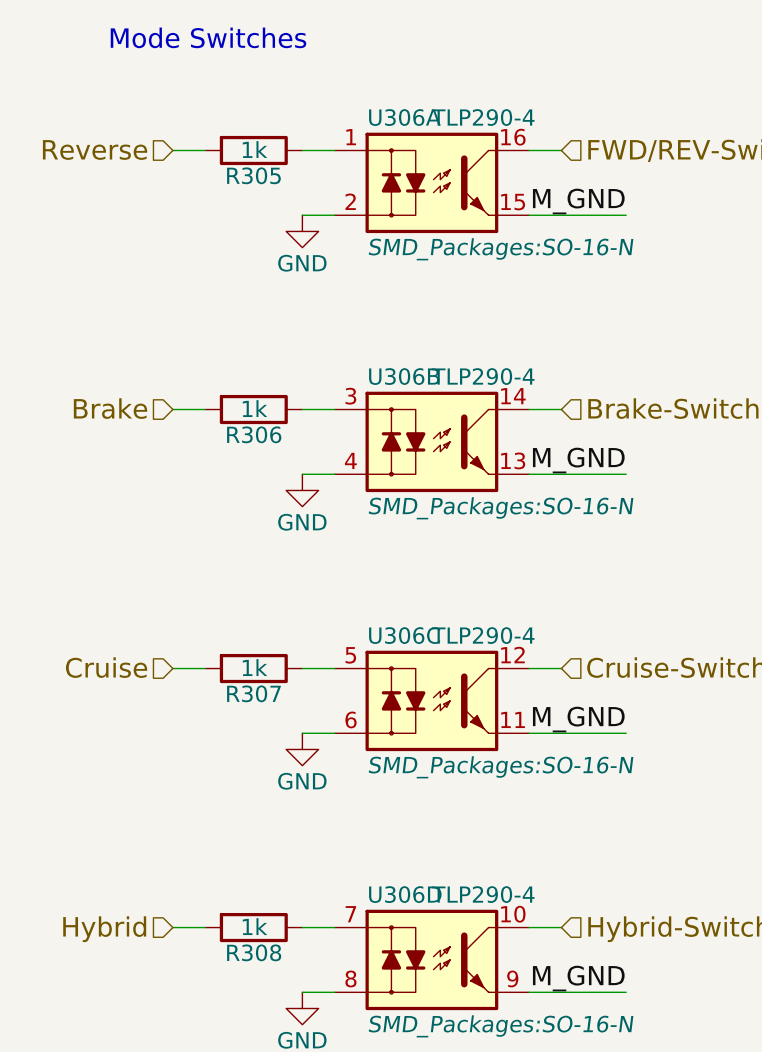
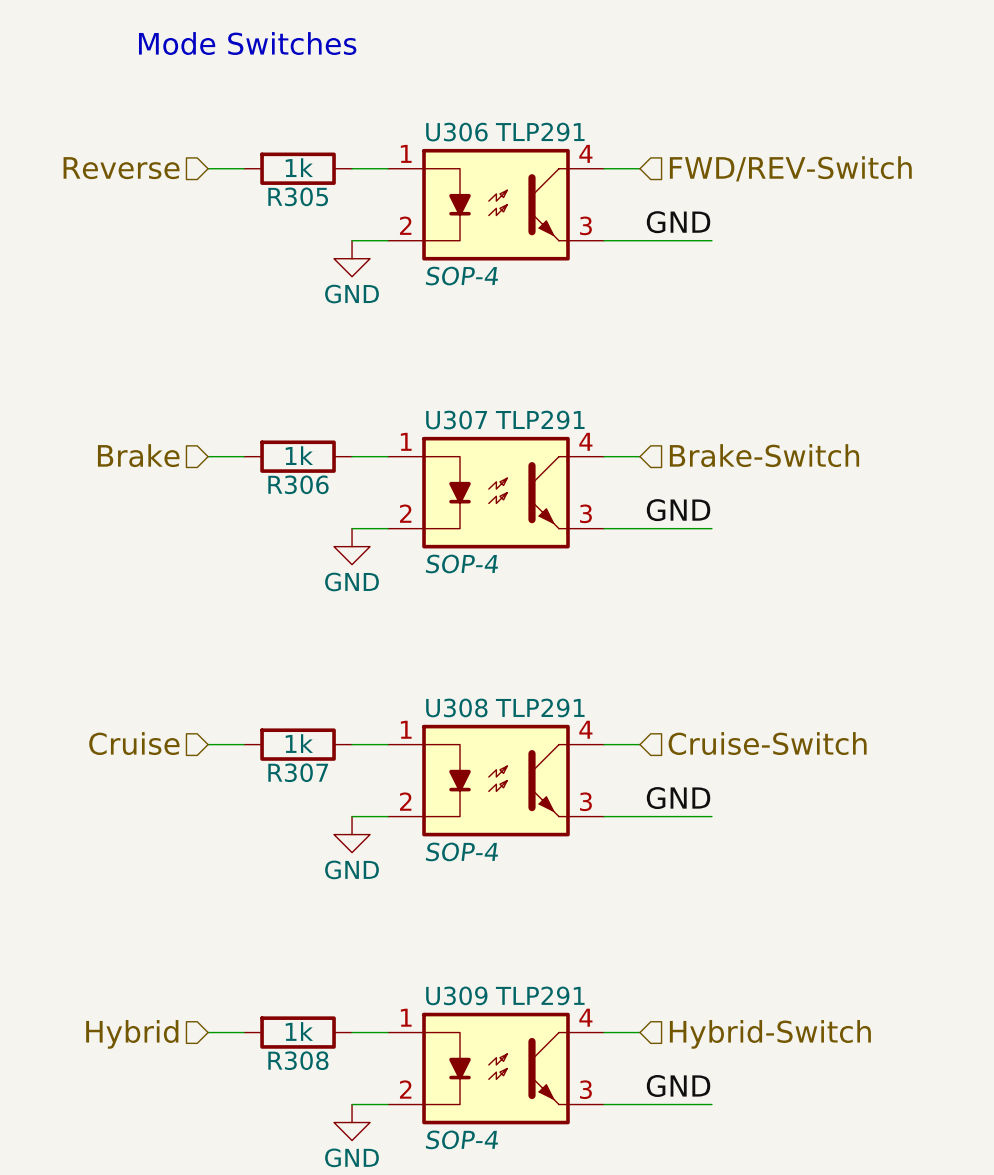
U306A: TLP290-4 (431, 182) -> none
U306: none -> TLP291 (496, 204)
label: M_GND (578, 201) -> GND (678, 222)
U306B: TLP290-4 (431, 441) -> none
U307: none -> TLP291 (496, 492)
label: M_GND (578, 460) -> GND (678, 510)
U306C: TLP290-4 (431, 700) -> none
U308: none -> TLP291 (496, 780)
label: M_GND (578, 719) -> GND (678, 798)
U306D: TLP290-4 (431, 959) -> none
U309: none -> TLP291 (496, 1068)
label: M_GND (578, 978) -> GND (678, 1085)

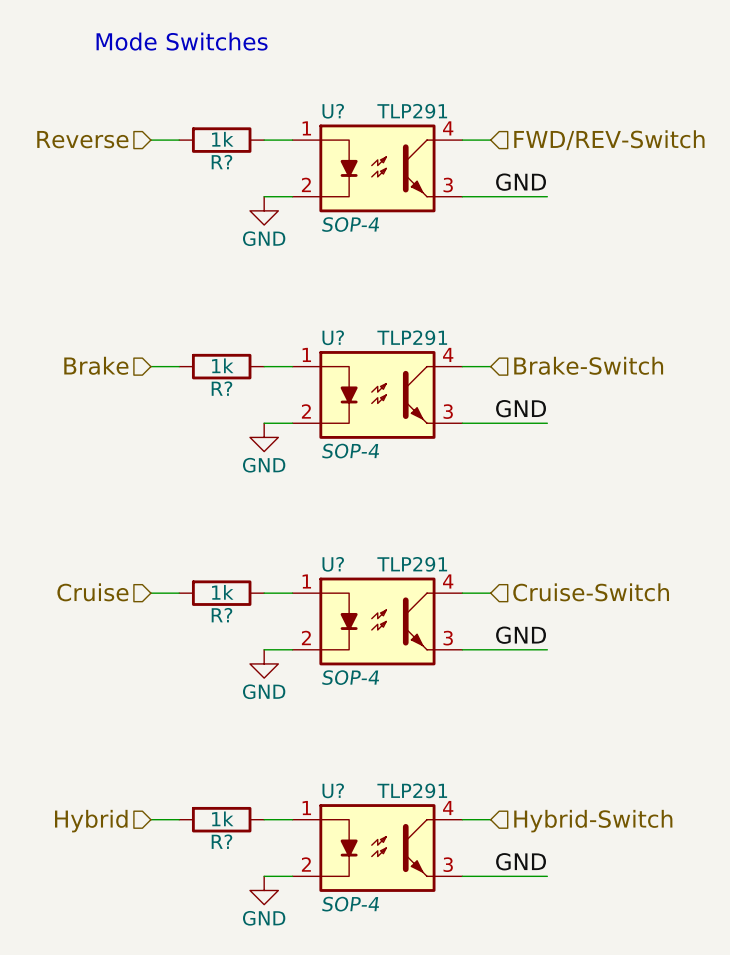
U306 name: U306 (456, 132) -> U? (333, 111)
R305 name: R305 (298, 196) -> R? (221, 162)
U307 name: U307 (456, 420) -> U? (333, 337)
R306 name: R306 (298, 484) -> R? (221, 388)
U308 name: U308 (456, 707) -> U? (333, 564)
R307 name: R307 (298, 772) -> R? (221, 615)
U309 name: U309 (456, 995) -> U? (333, 790)
R308 name: R308 (298, 1060) -> R? (221, 841)

